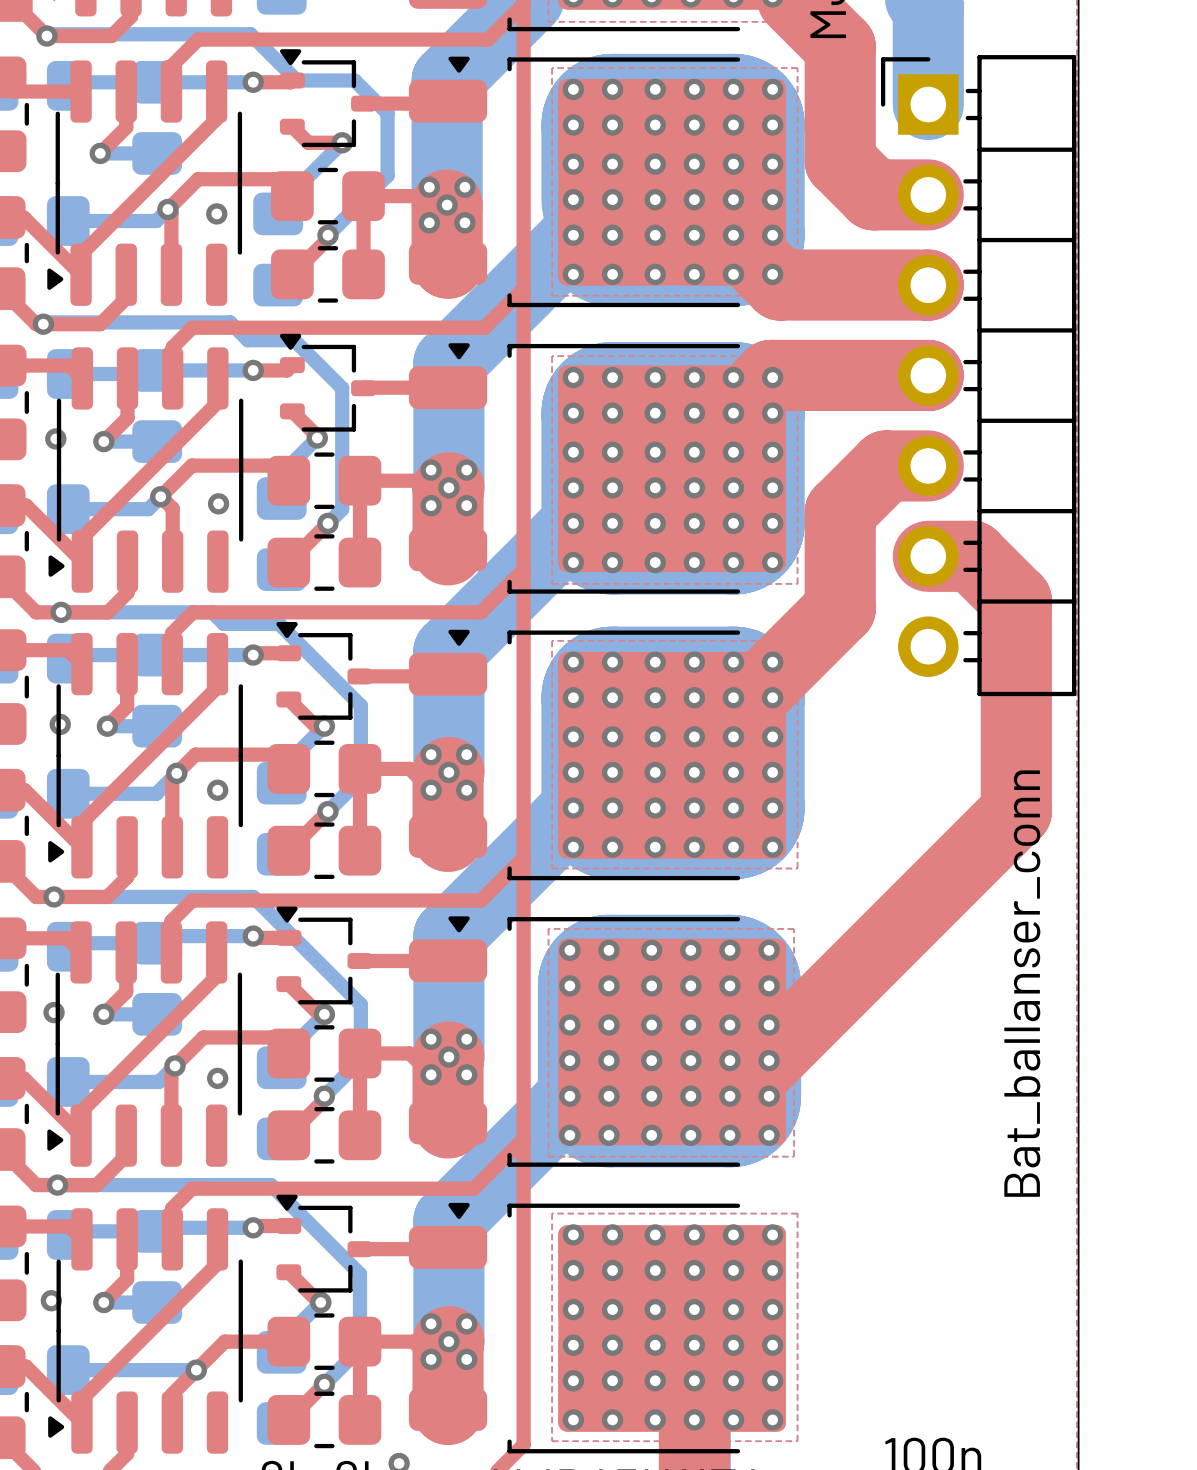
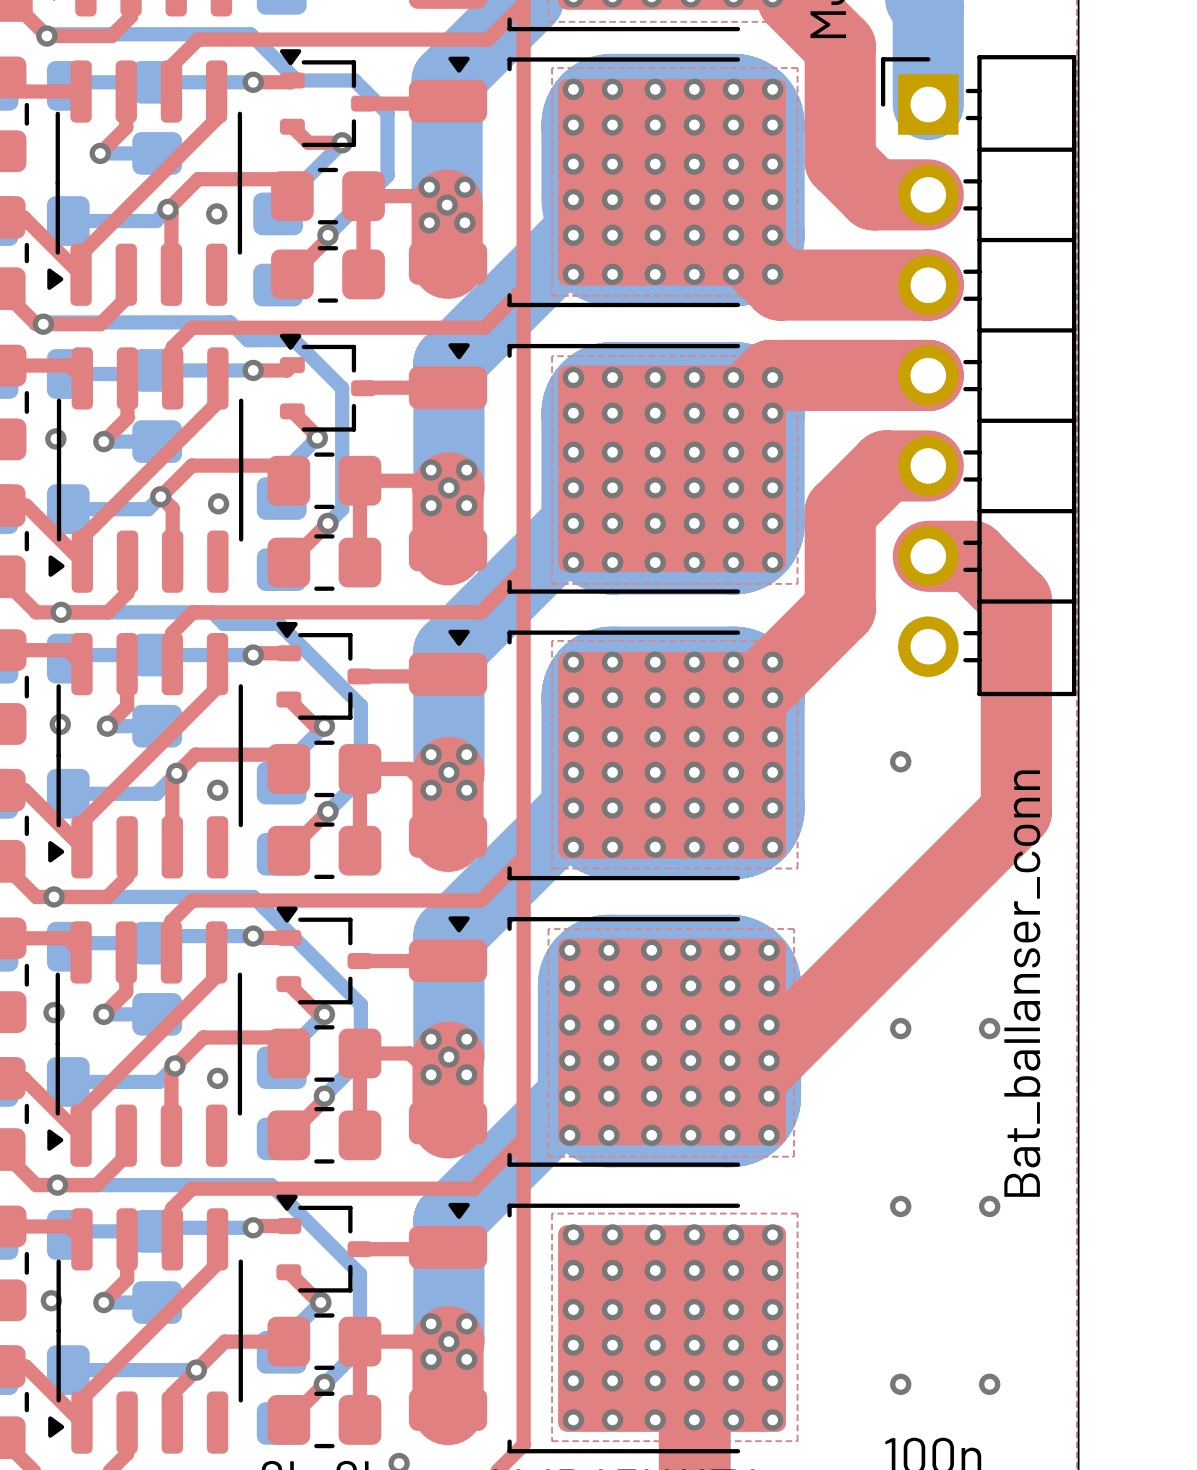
via: none -> (900, 761)
via: none -> (900, 1028)
via: none -> (989, 1028)
via: none -> (900, 1206)
via: none -> (989, 1206)
via: none -> (900, 1384)
via: none -> (989, 1384)

